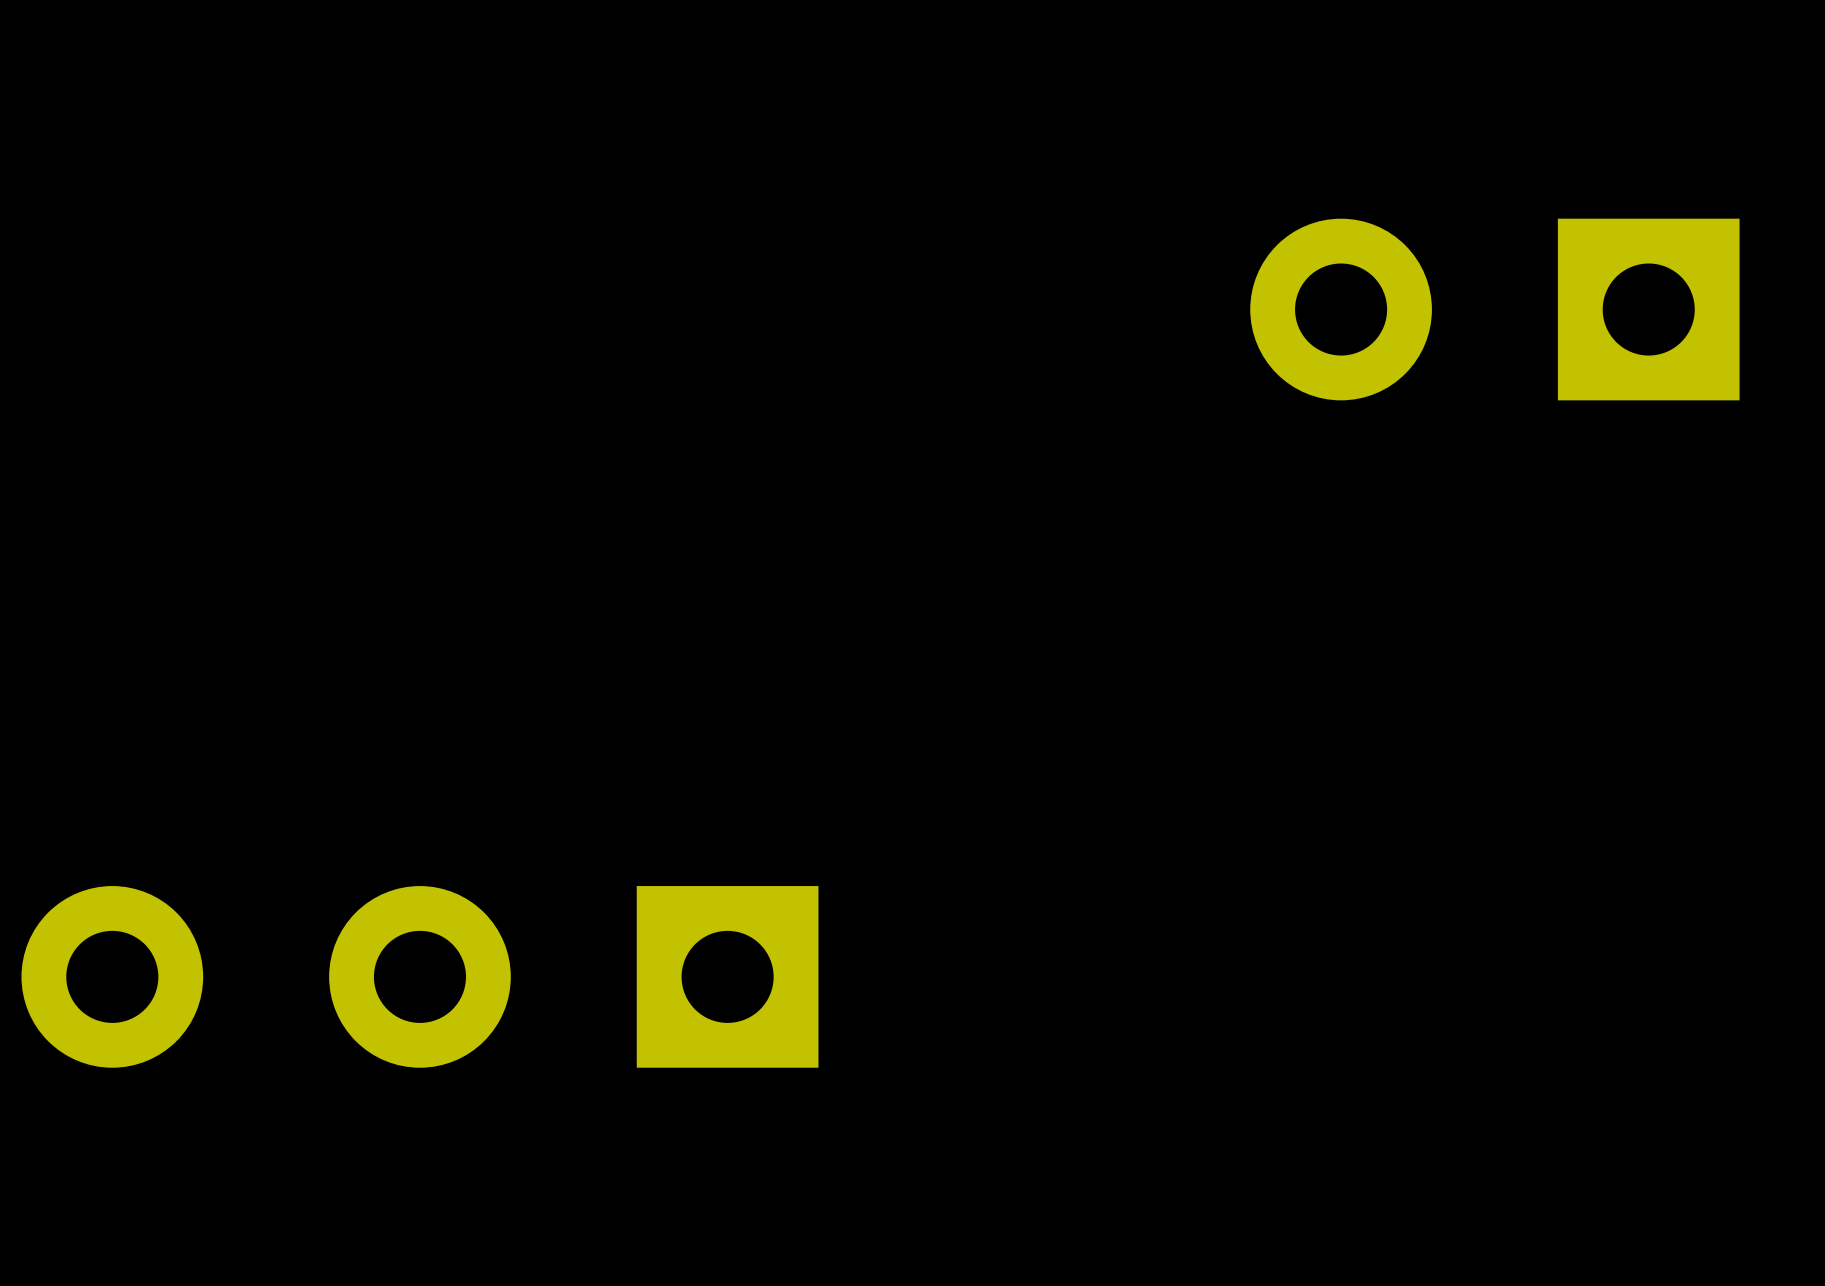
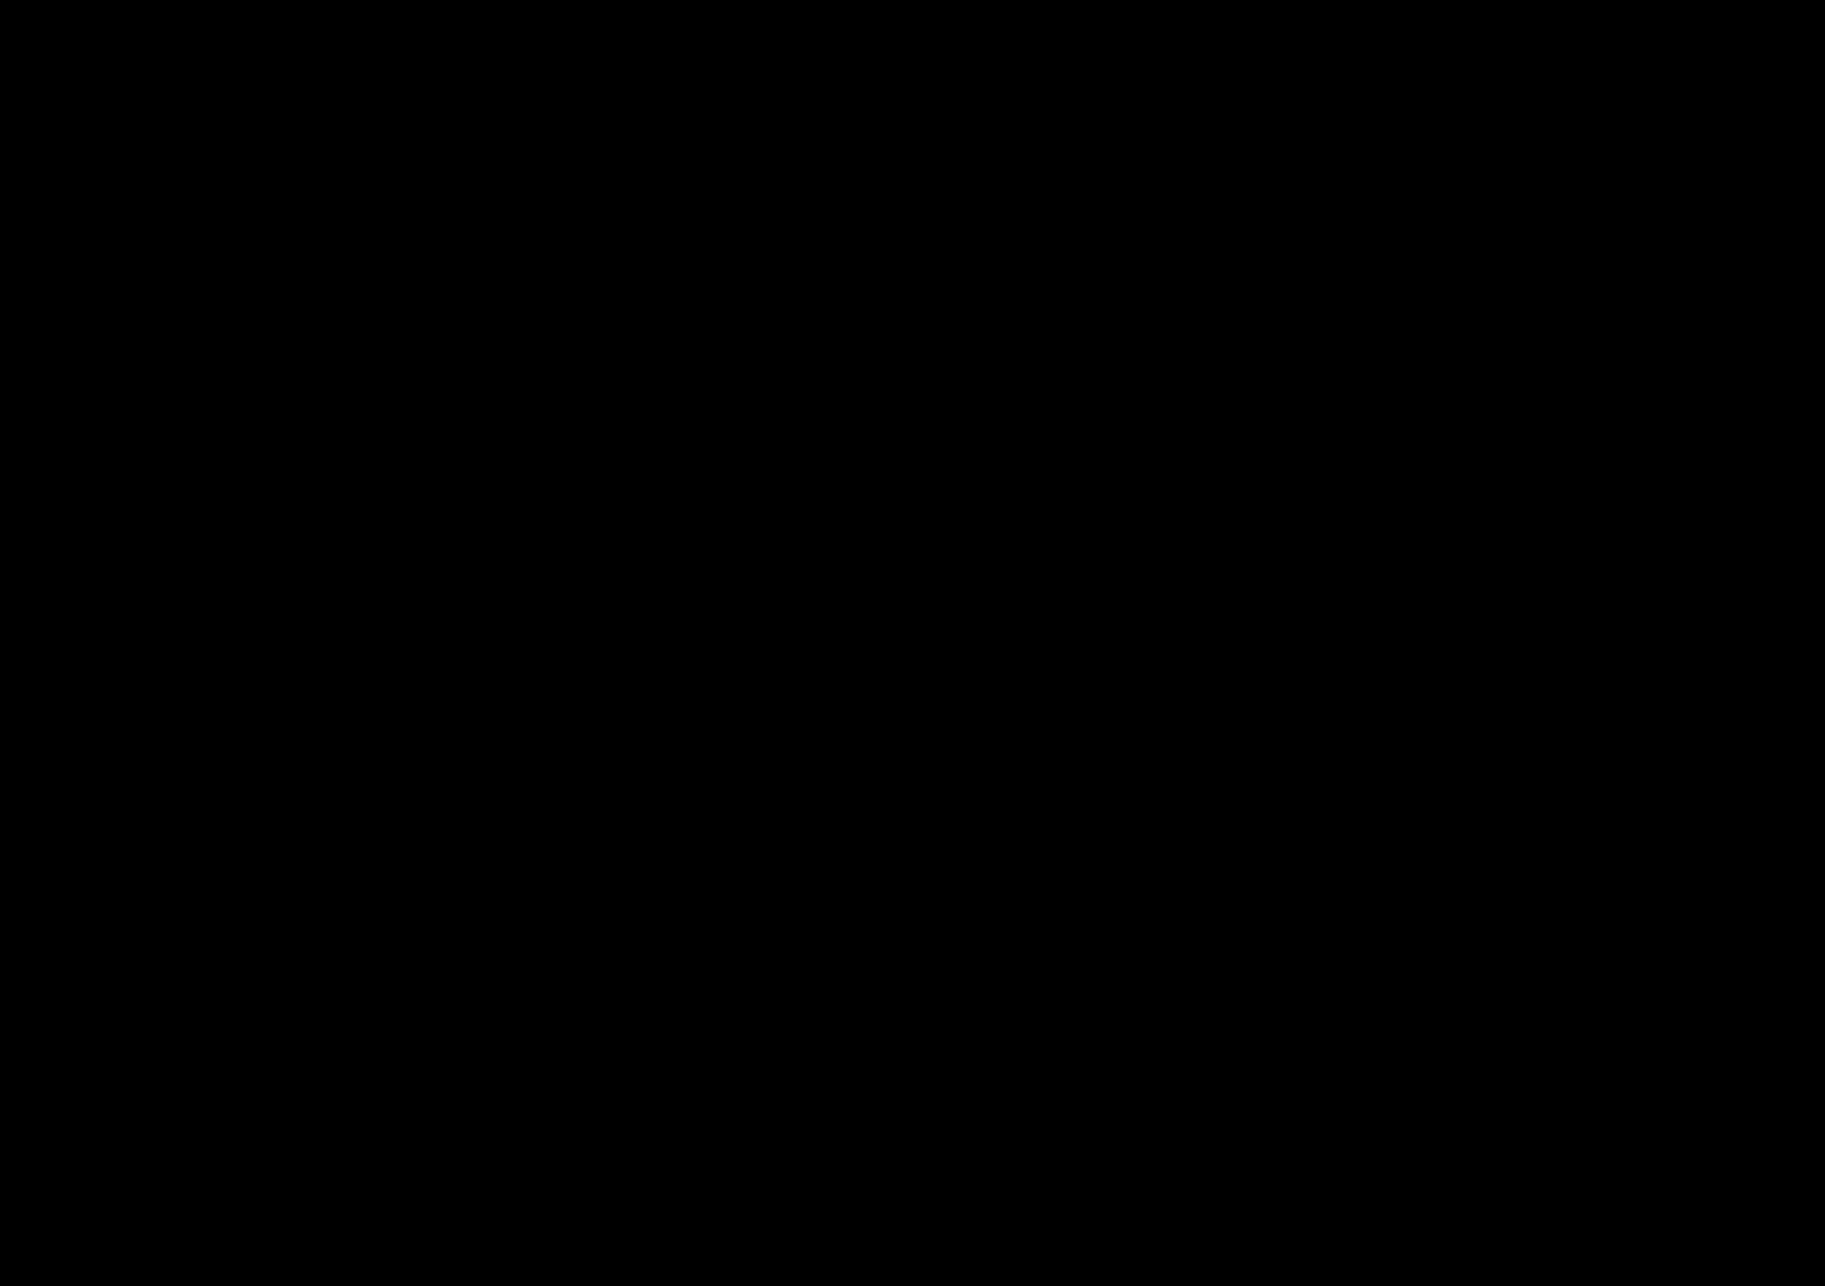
part: (1494, 309) -> none
part: (419, 976) -> none

